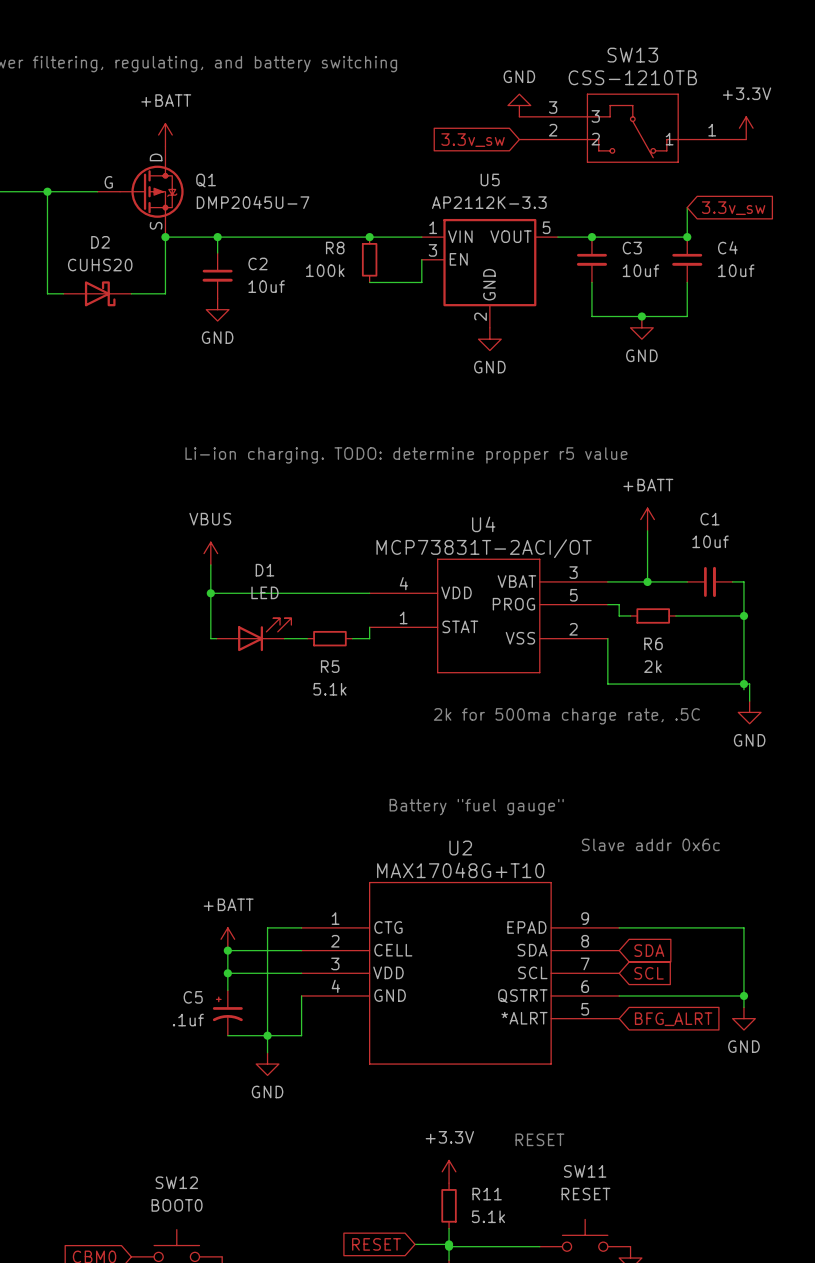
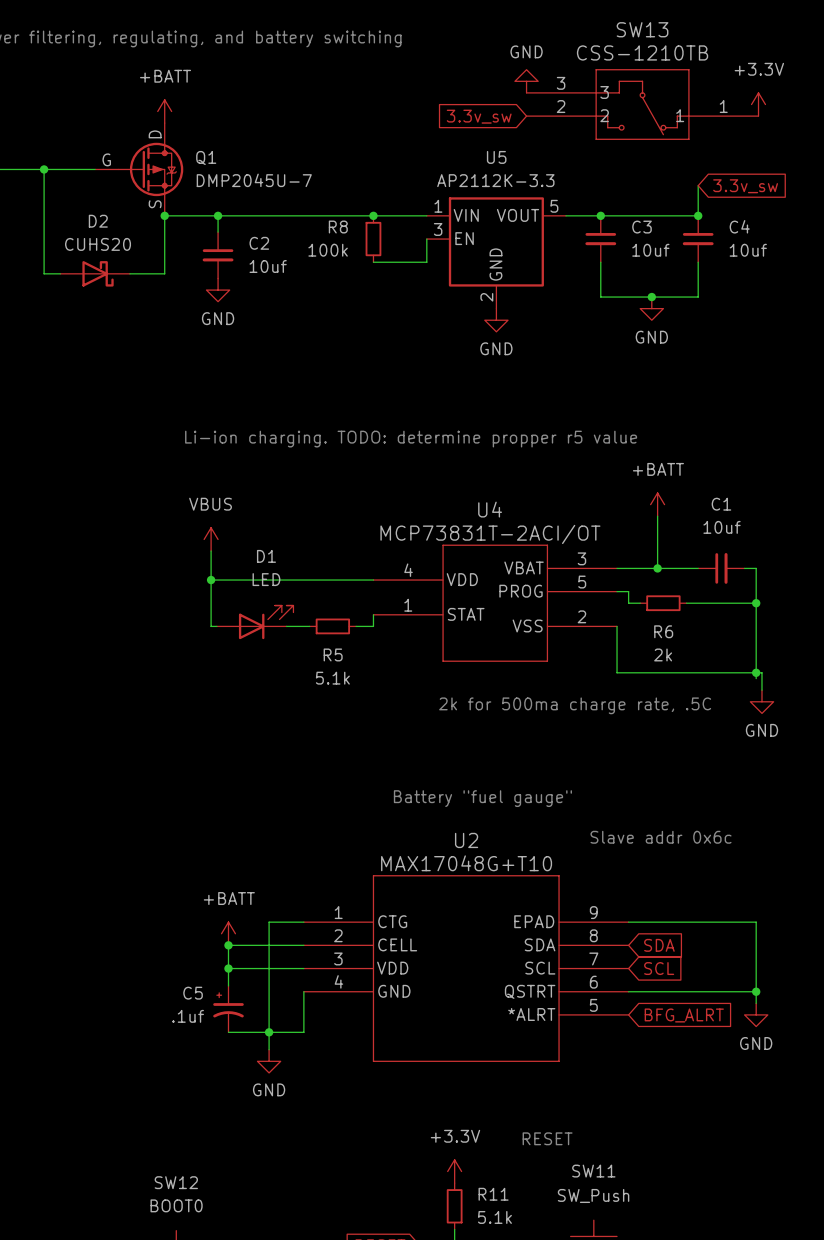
SW11 value: RESET (585, 1194) -> SW_Push (593, 1195)

